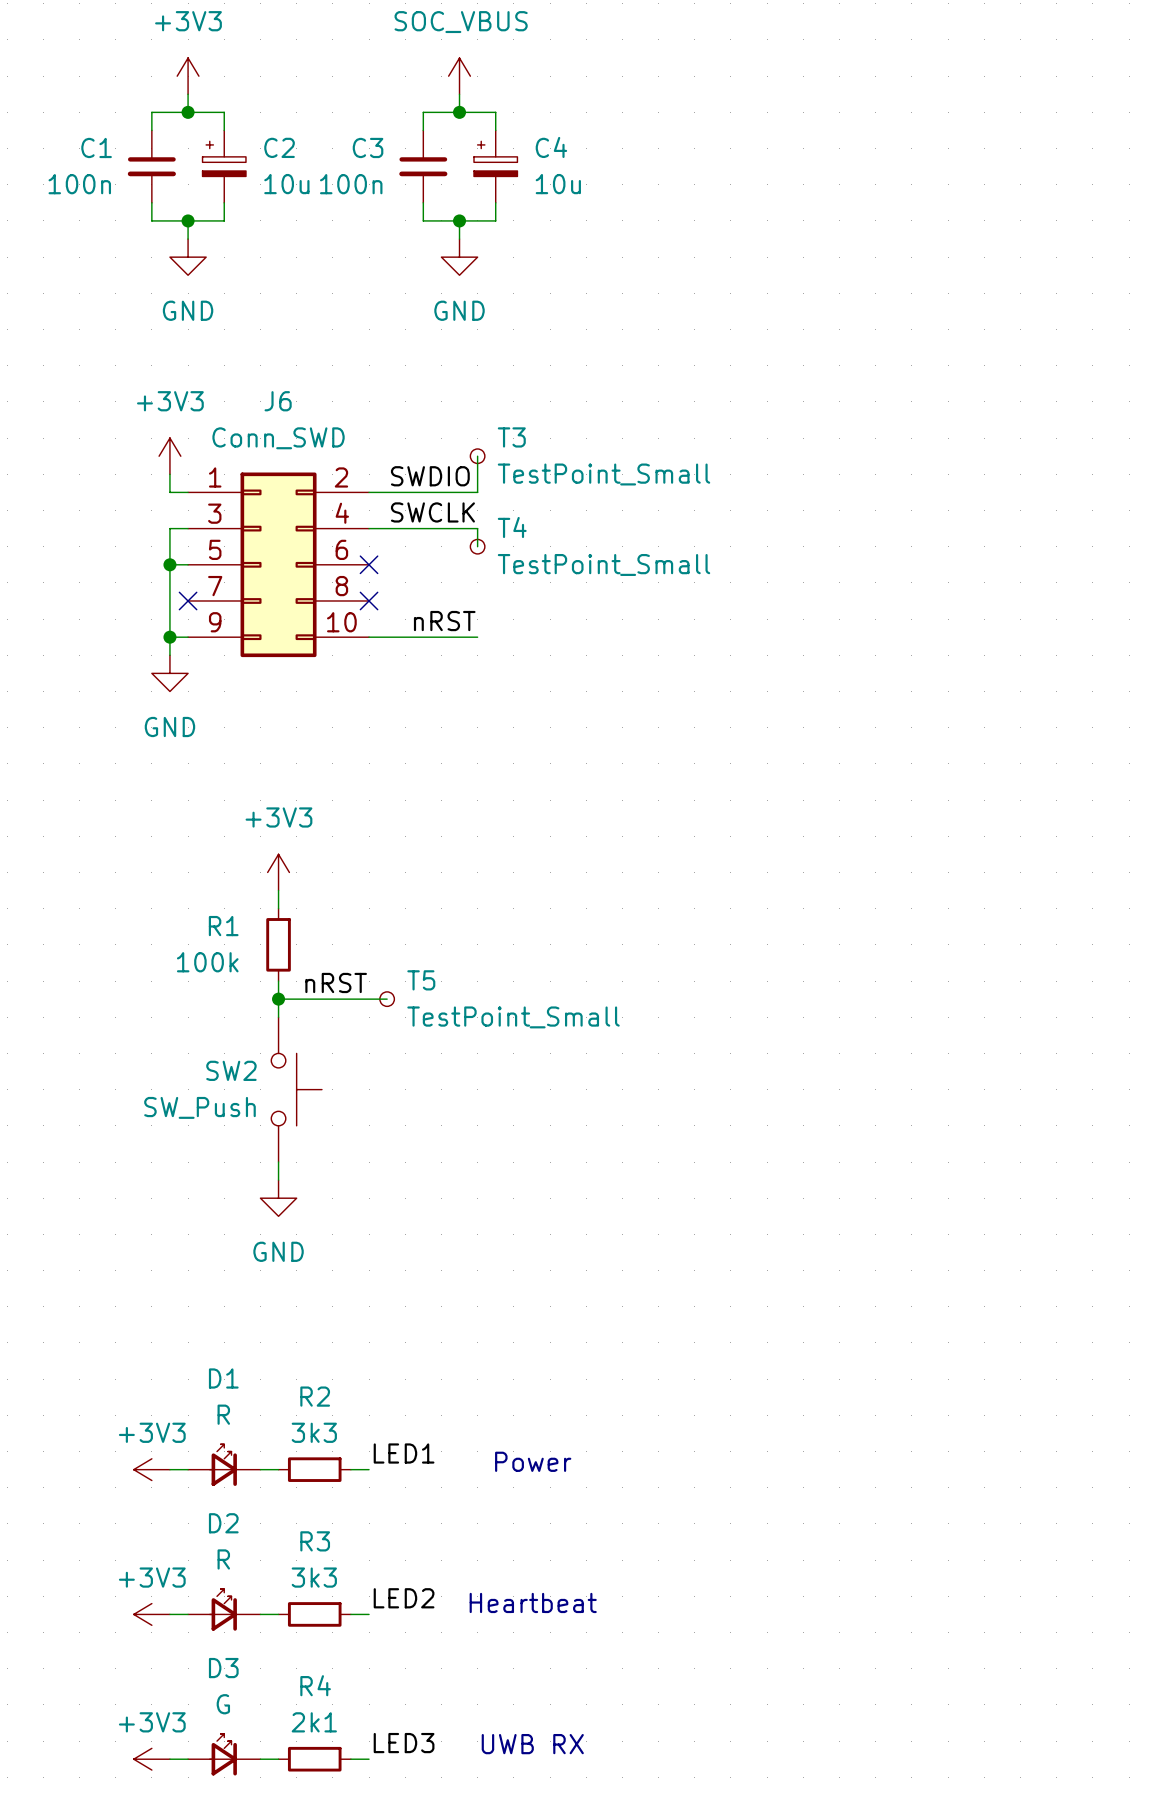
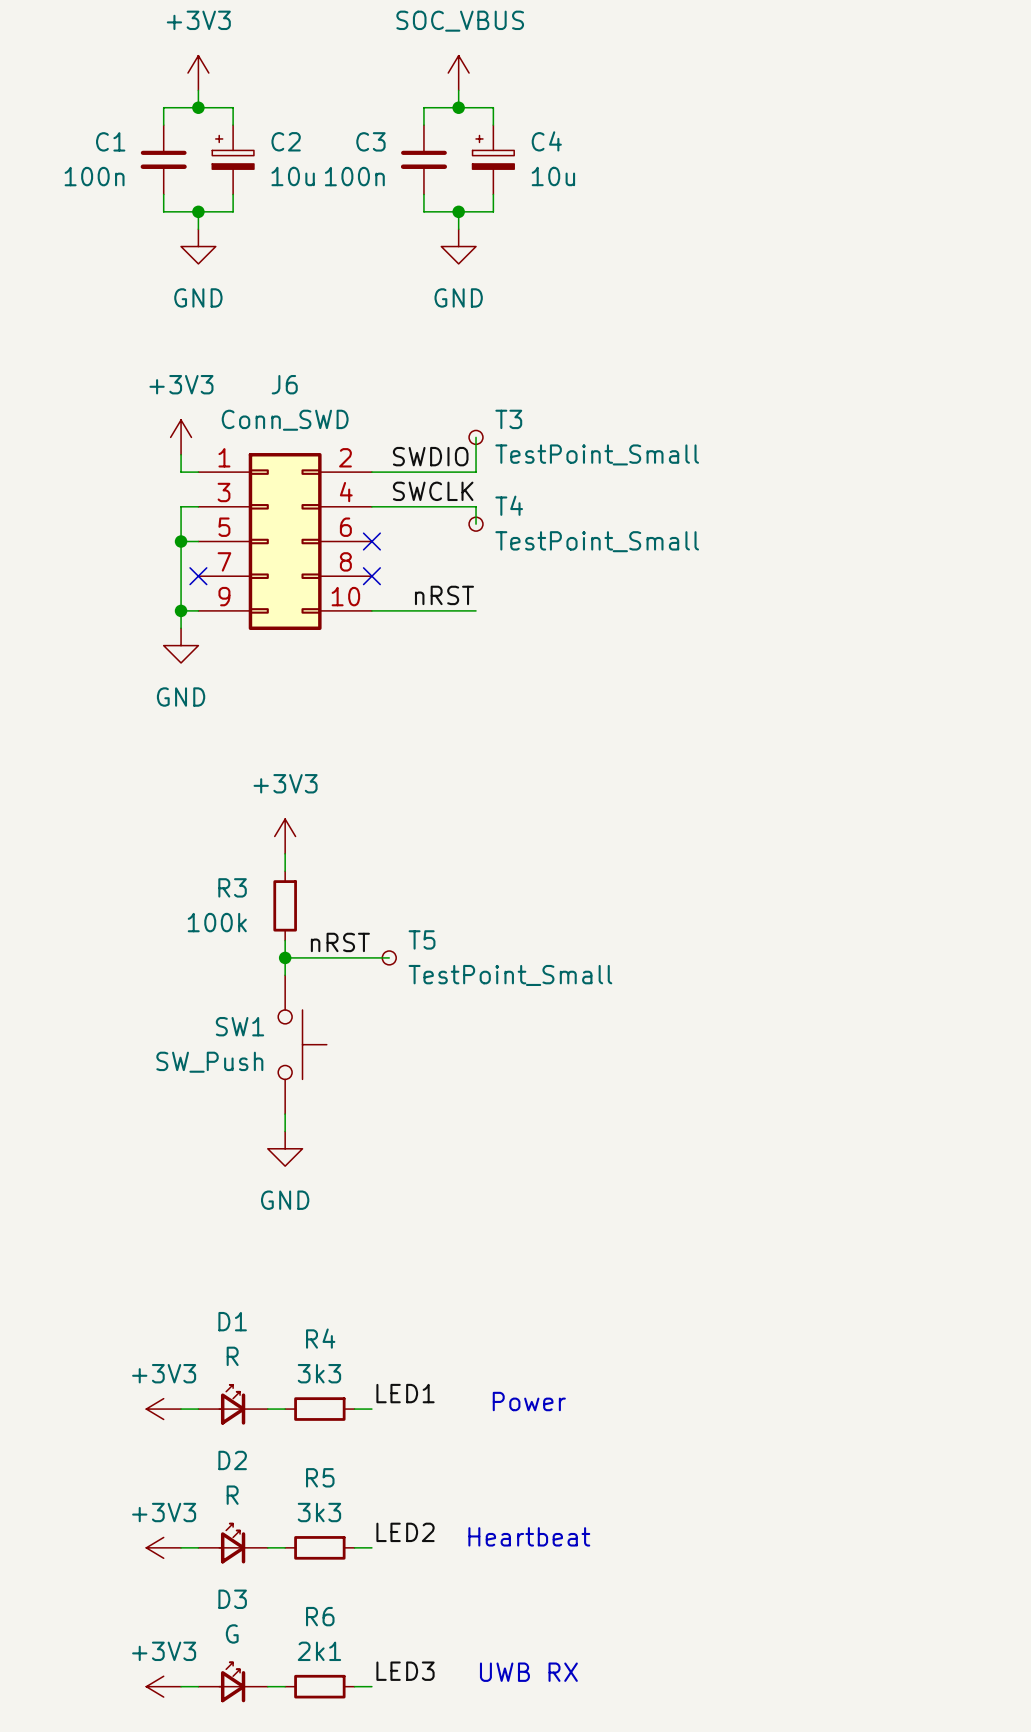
R1 name: R1 (223, 926) -> R3 (232, 887)
SW2 name: SW2 (231, 1070) -> SW1 (239, 1026)
R2 name: R2 (315, 1396) -> R4 (320, 1338)
R3 name: R3 (315, 1541) -> R5 (320, 1477)
R4 name: R4 (315, 1685) -> R6 (320, 1616)

